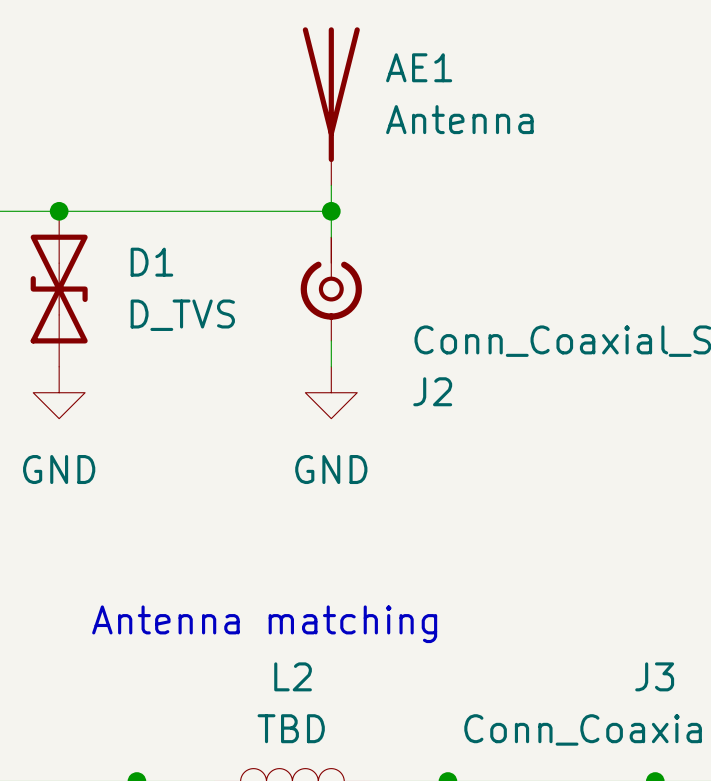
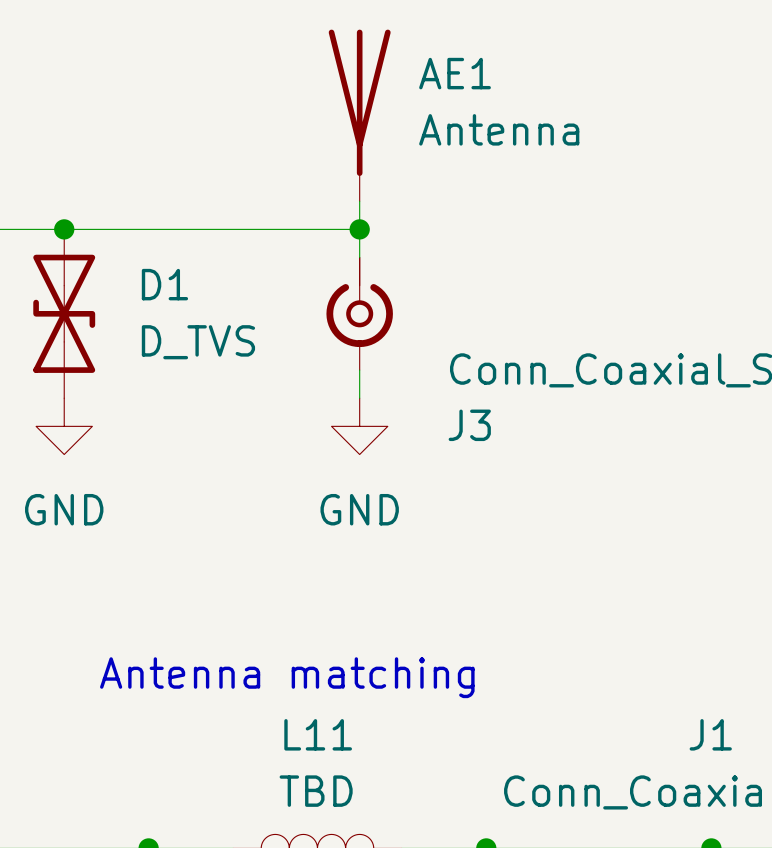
J2 name: J2 (432, 391) -> J3 (469, 425)
L2 name: L2 (293, 676) -> L11 (318, 734)
J3 name: J3 (654, 676) -> J1 (710, 734)

